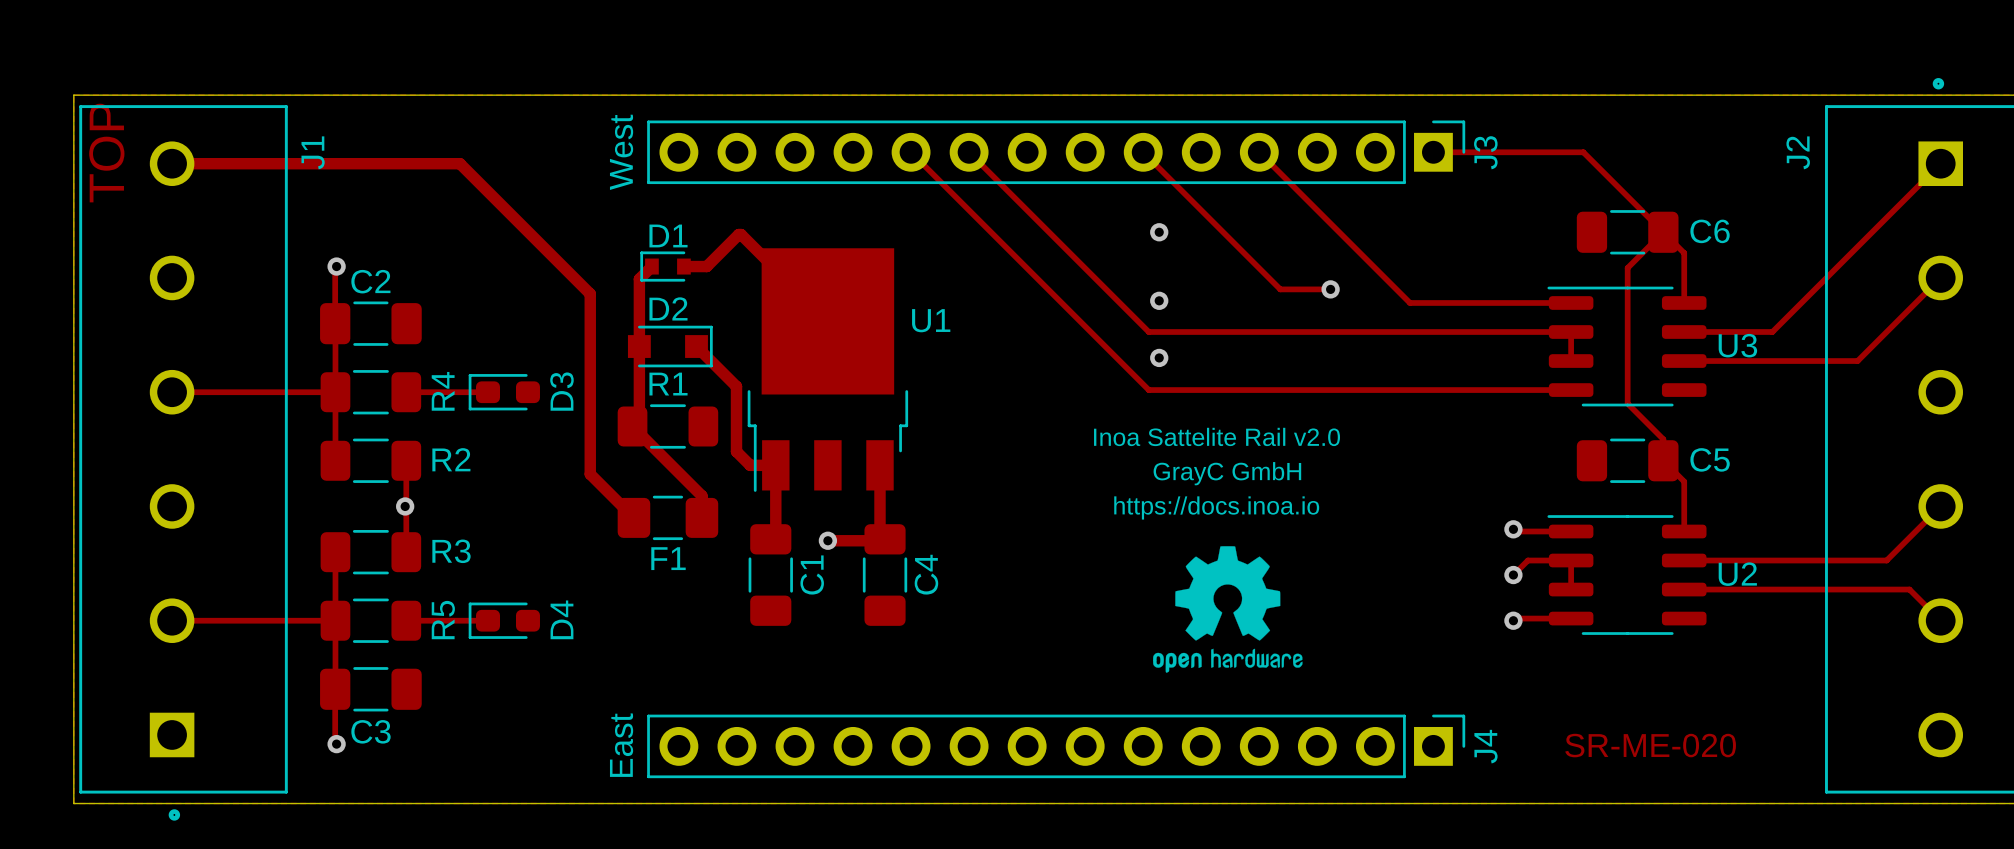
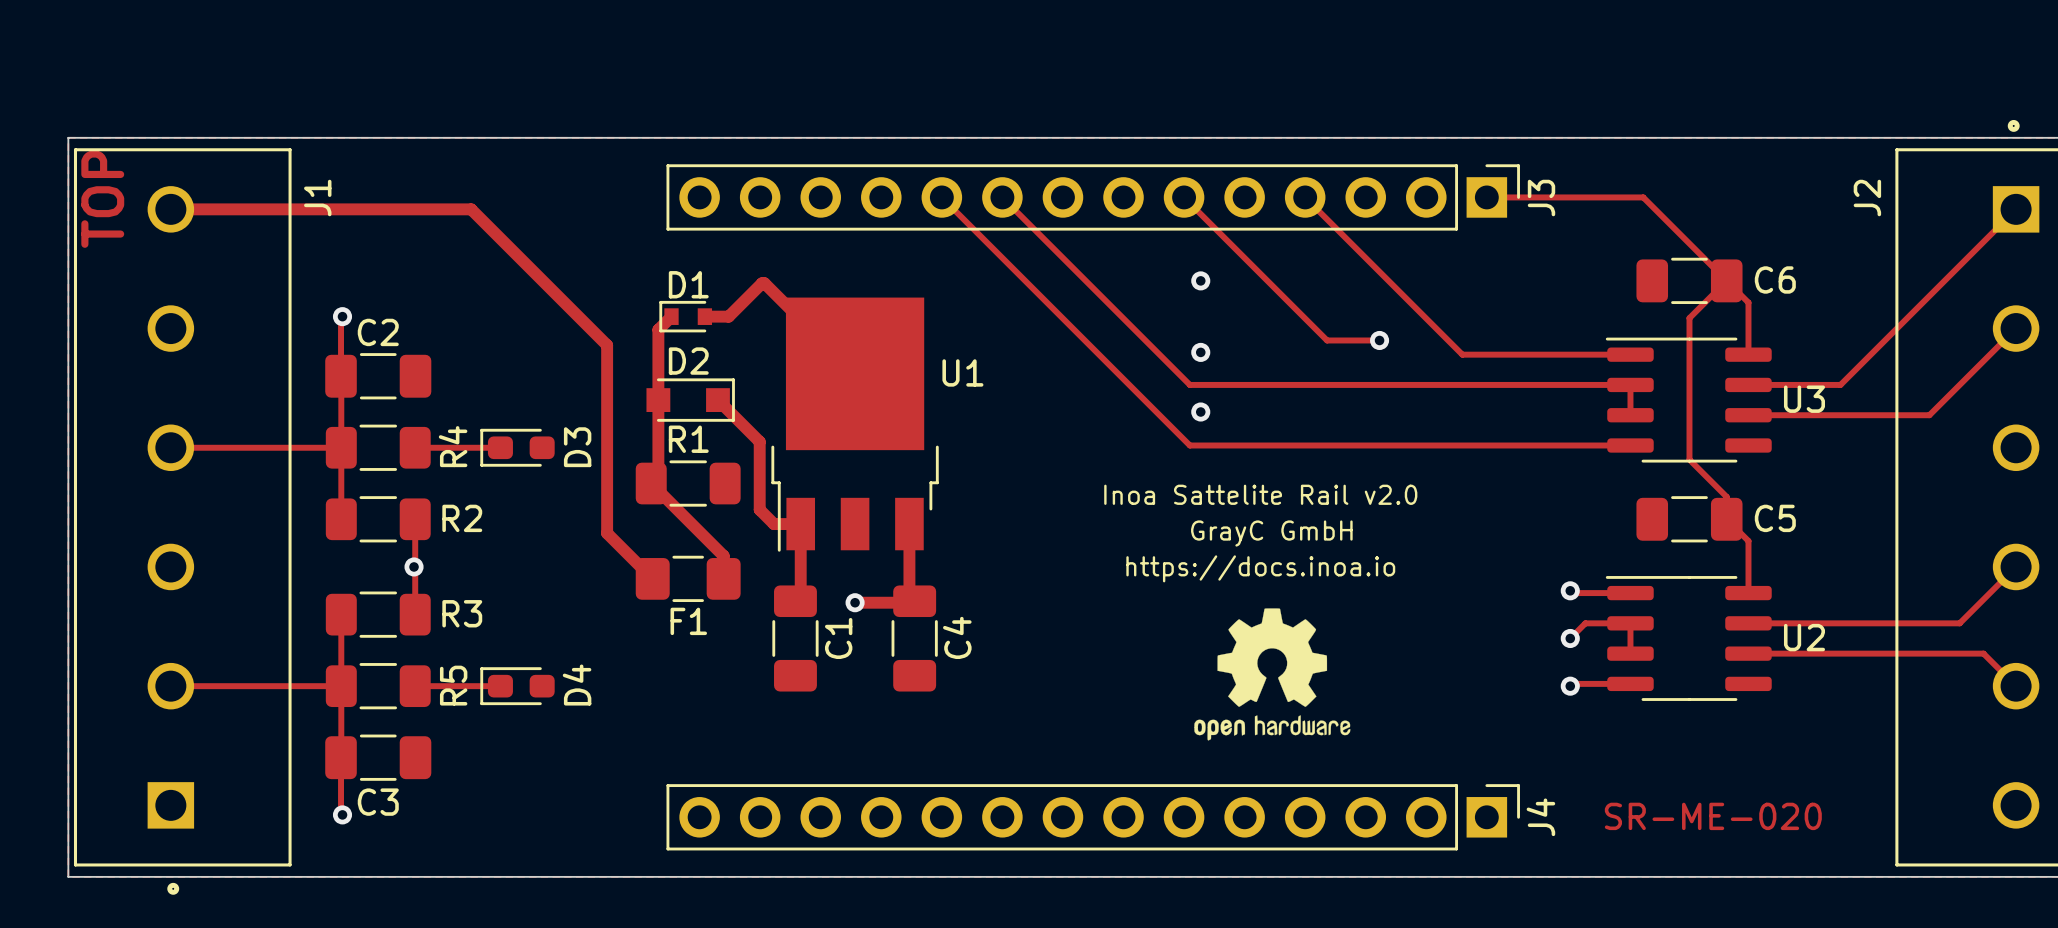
text: West (621, 152) -> none
text: East (621, 745) -> none

